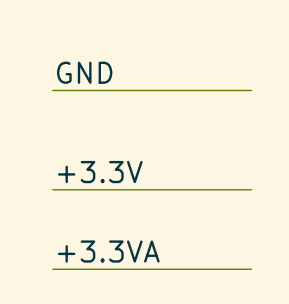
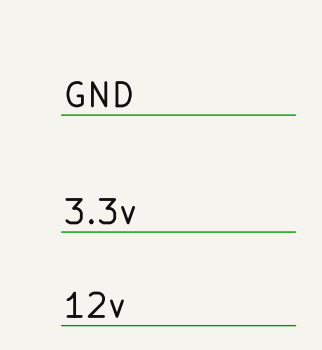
label: +3.3V (100, 172) -> 3.3v (100, 211)
label: +3.3VA (108, 251) -> 12v (95, 304)

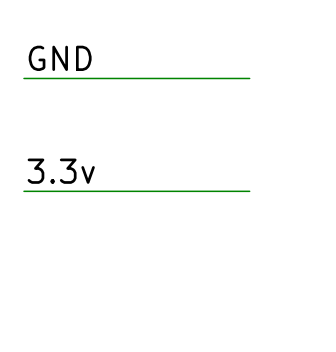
label: 12v (95, 304) -> none
wire: (61, 325) (295, 325) -> none

